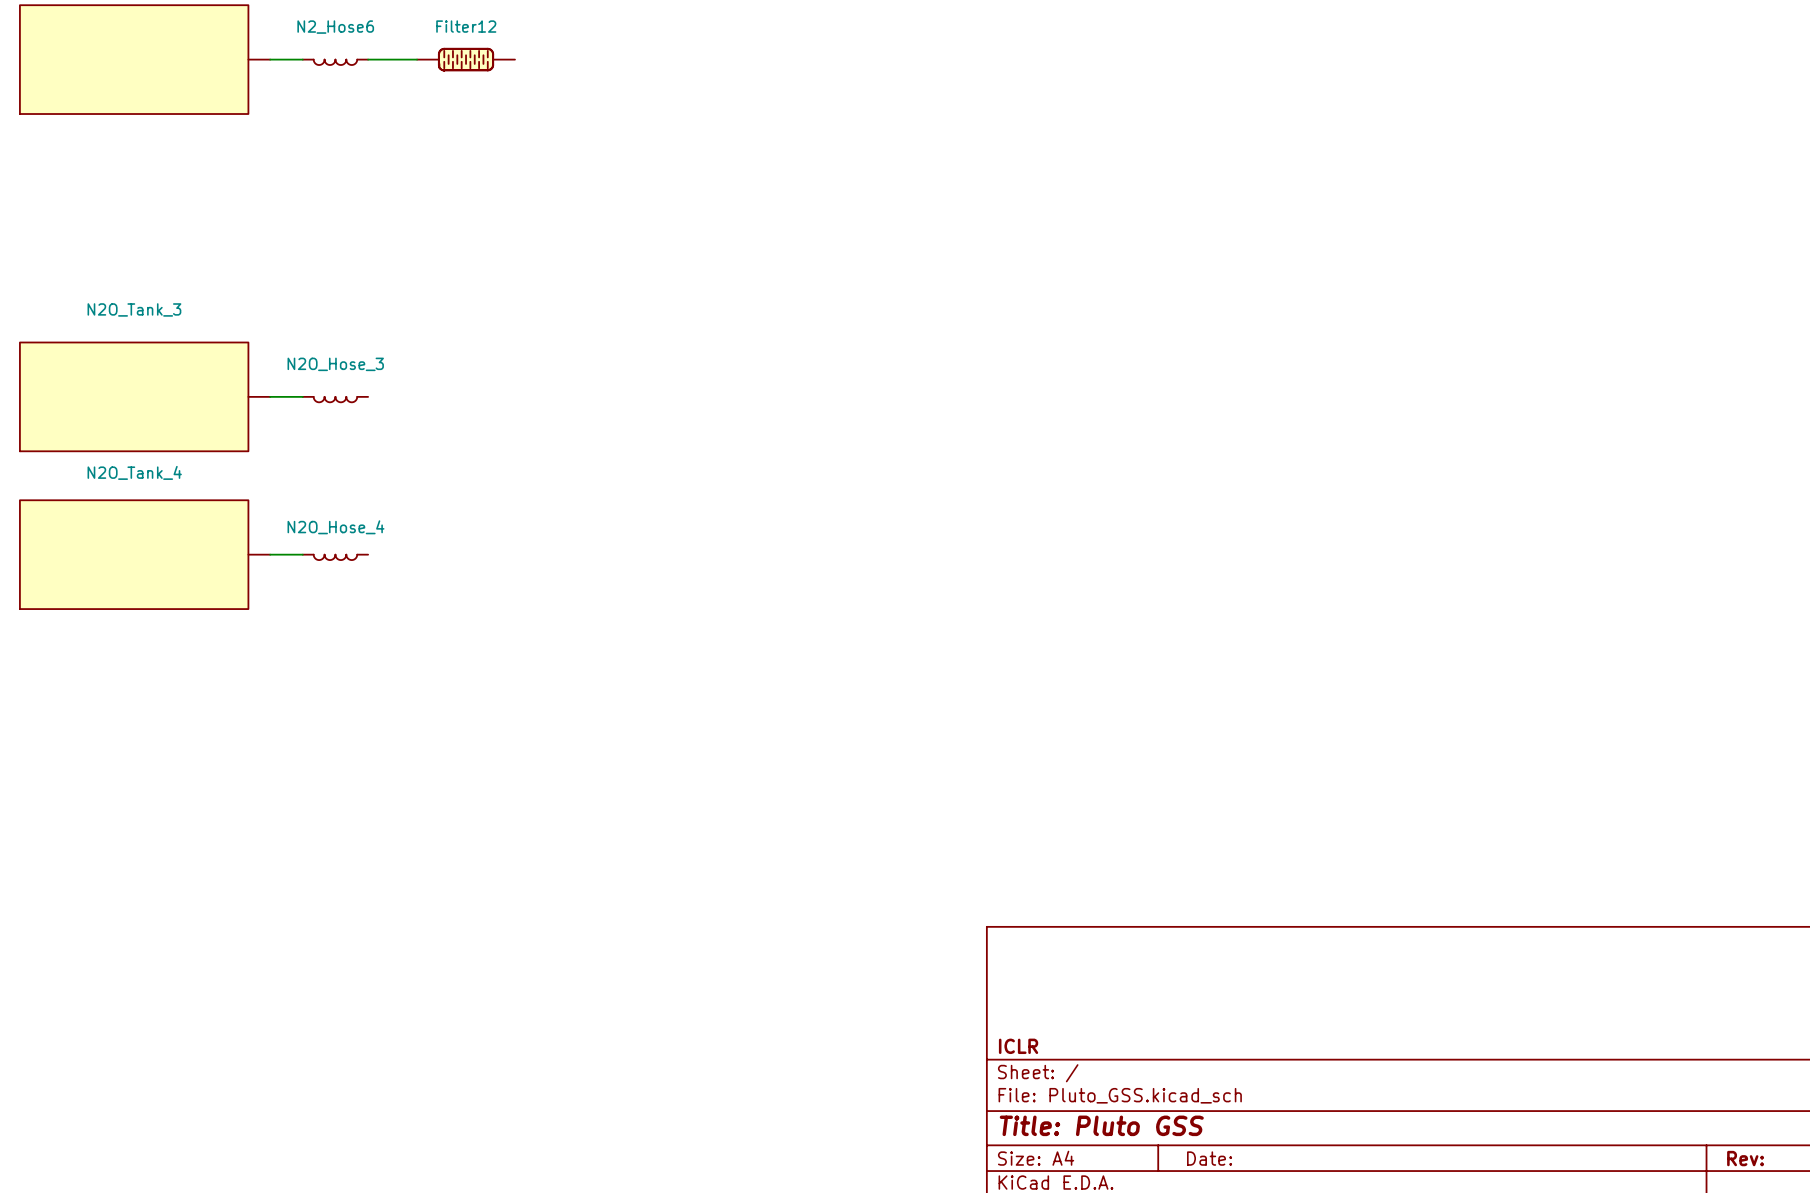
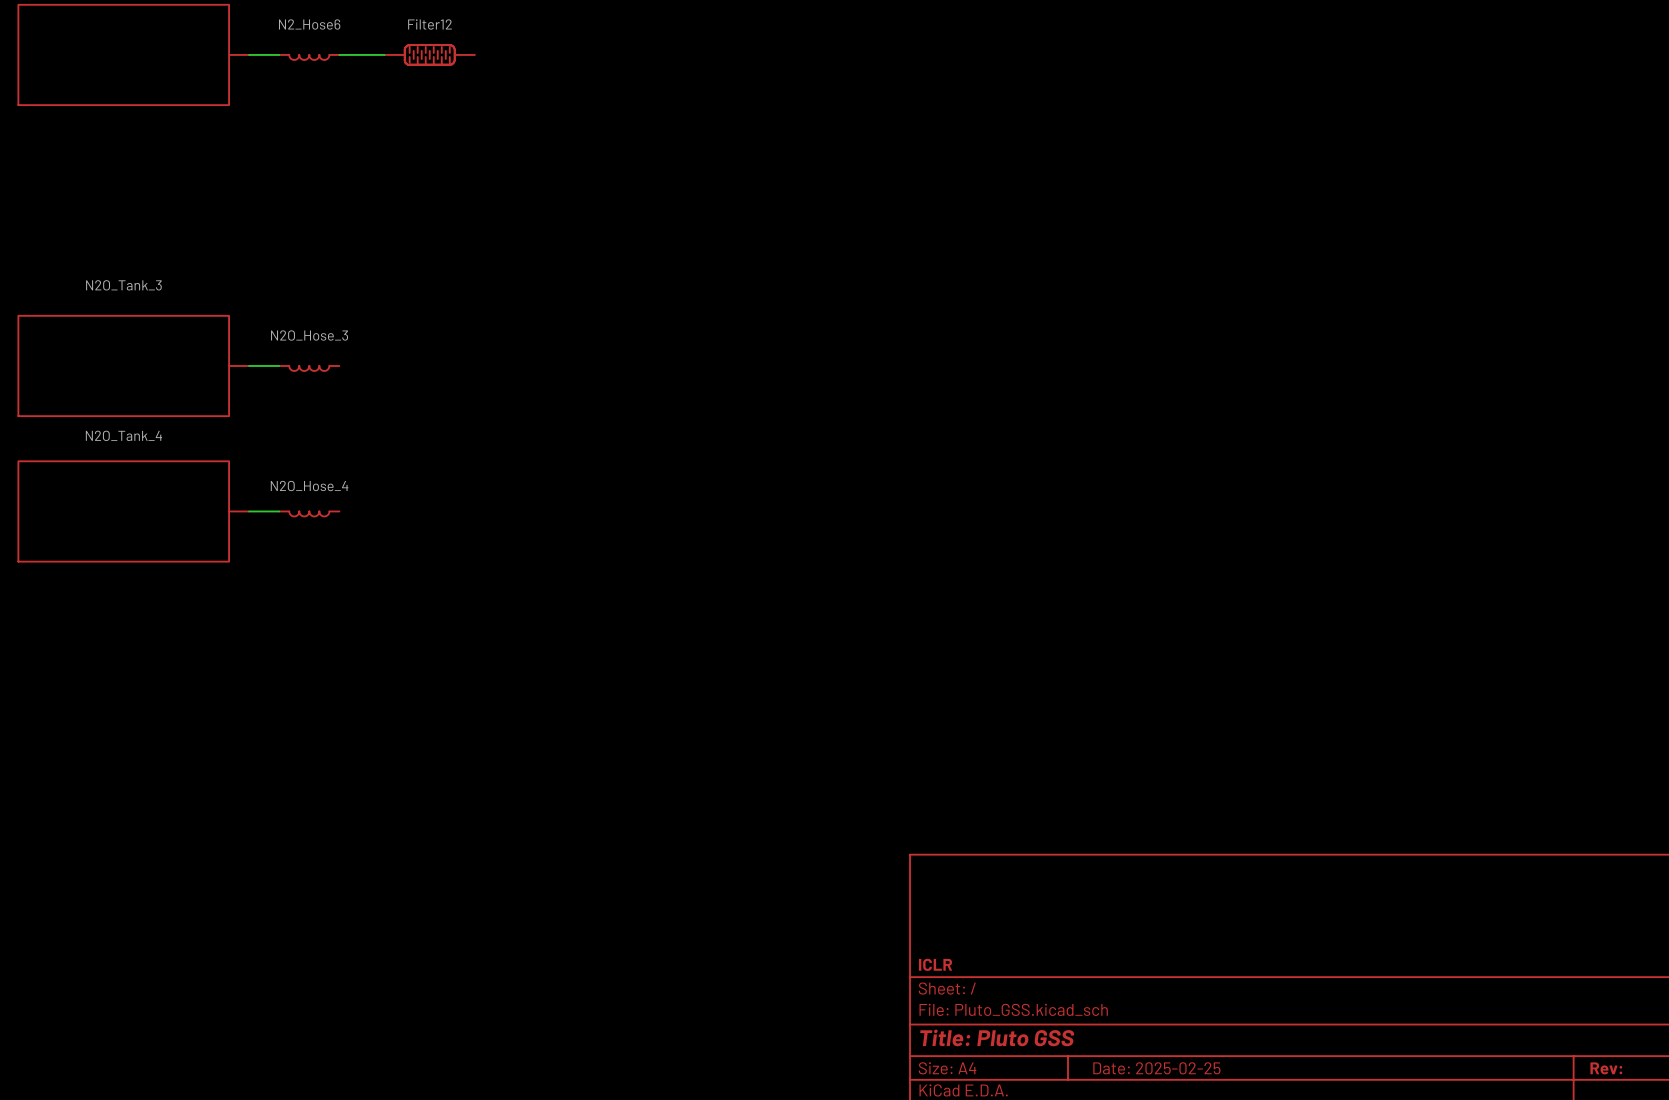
title block: Date: (1209, 1158) -> Date: 2025-02-25 (1156, 1068)

